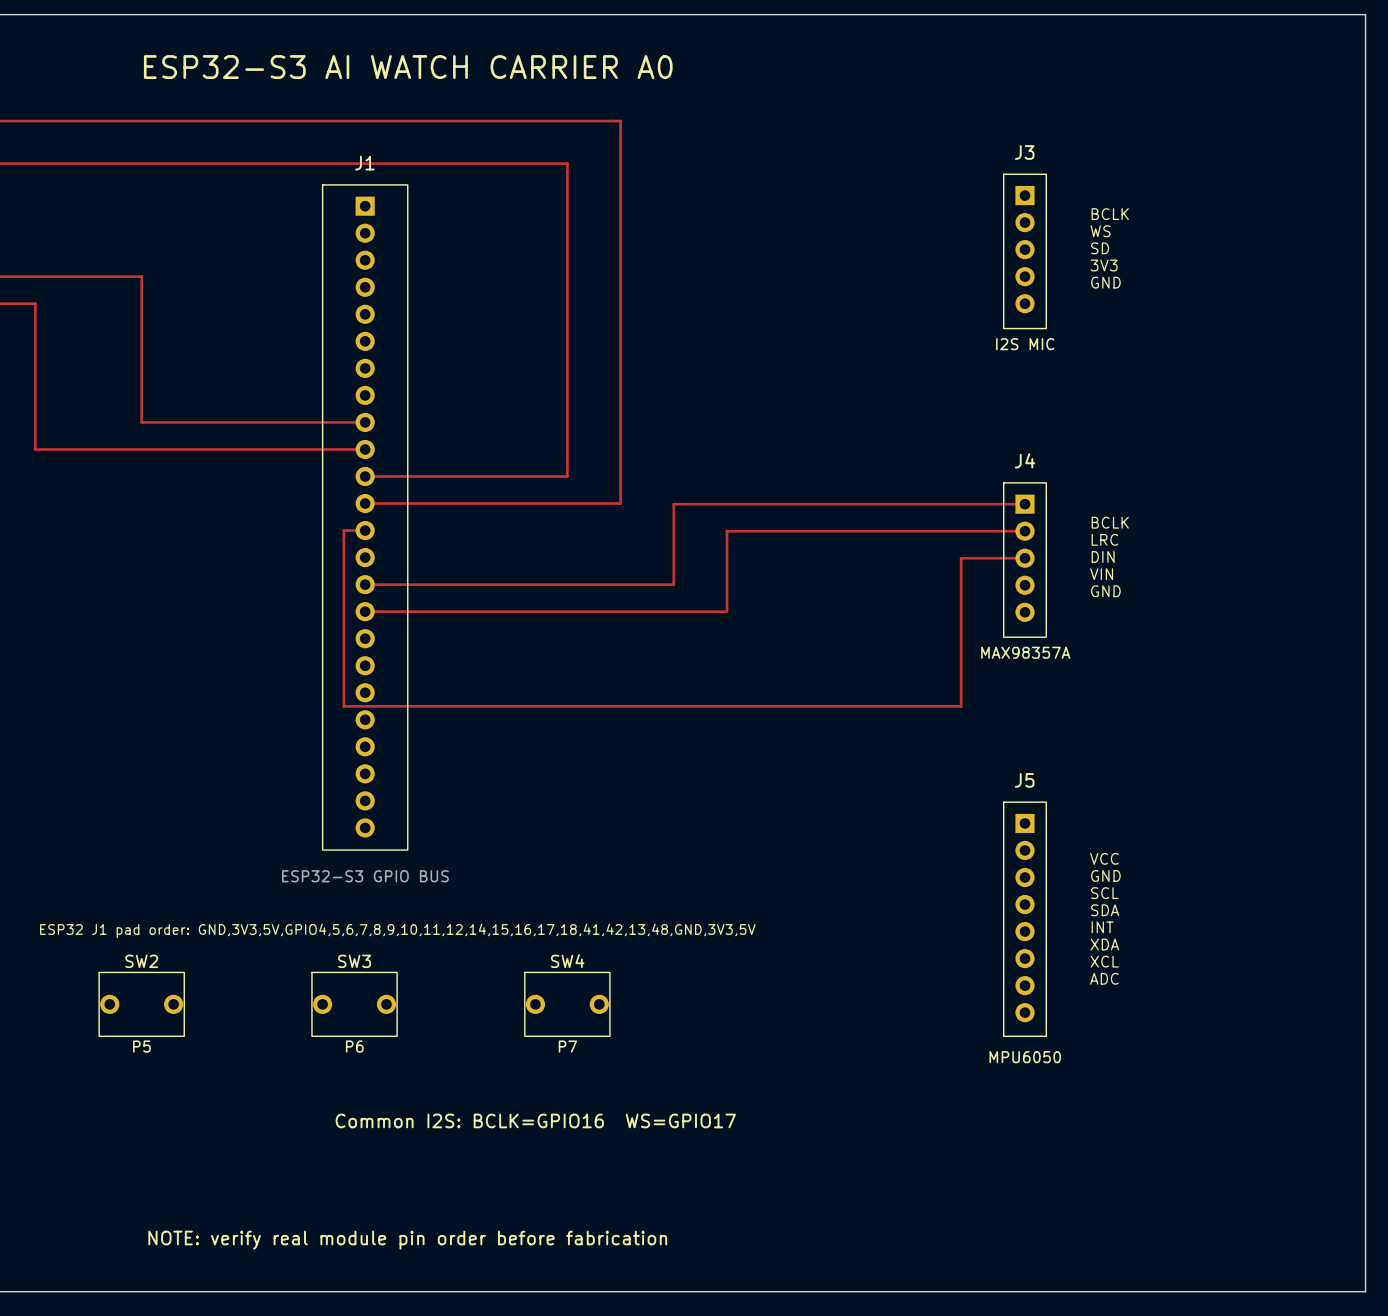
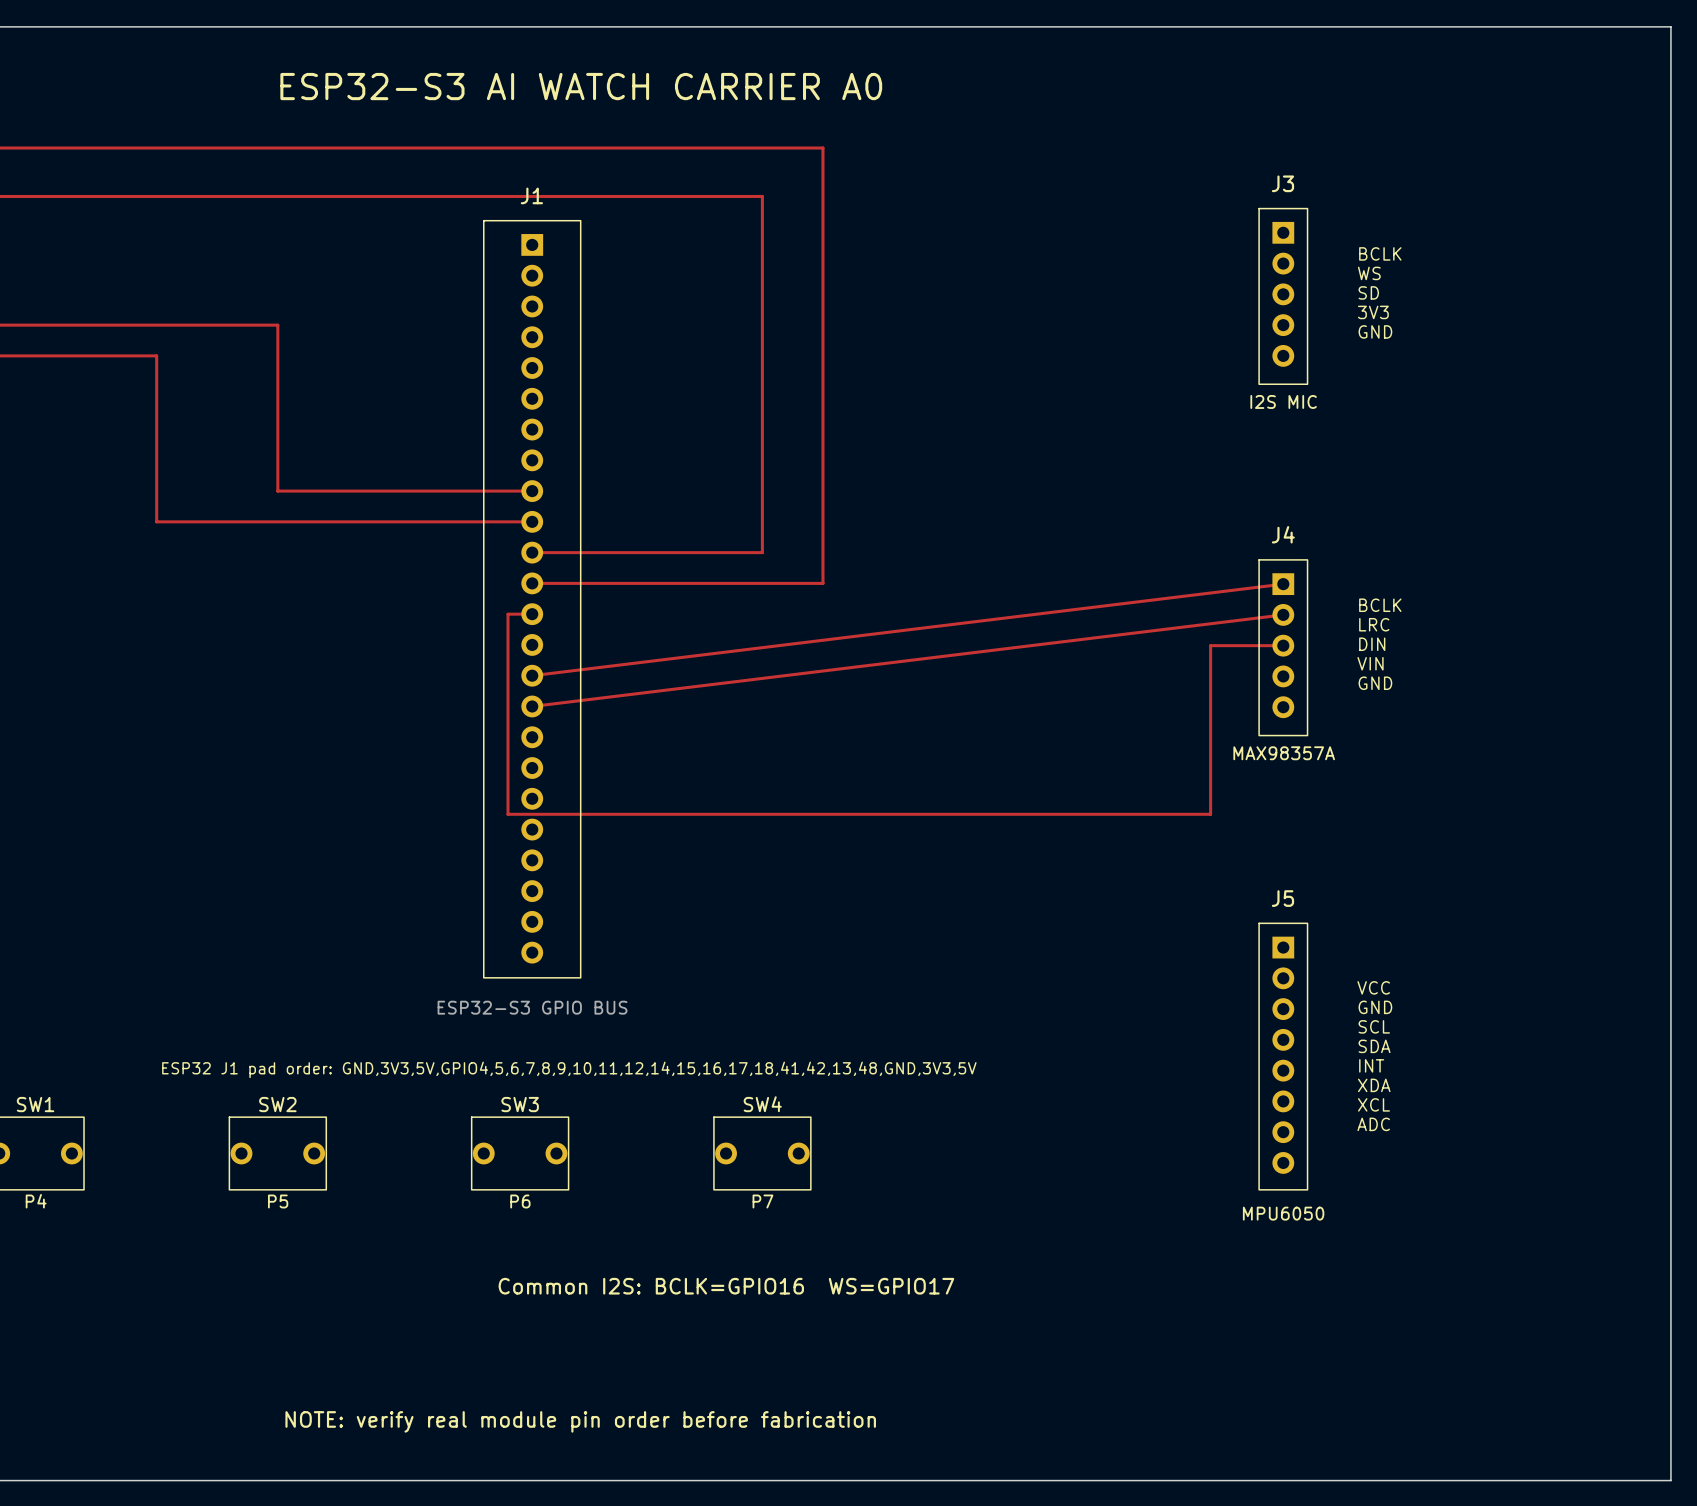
track: (1024, 504) (673, 504) (673, 584) (365, 584) -> (1283, 584) (532, 675)
track: (1024, 531) (727, 531) (727, 611) (365, 611) -> (1283, 614) (532, 706)

